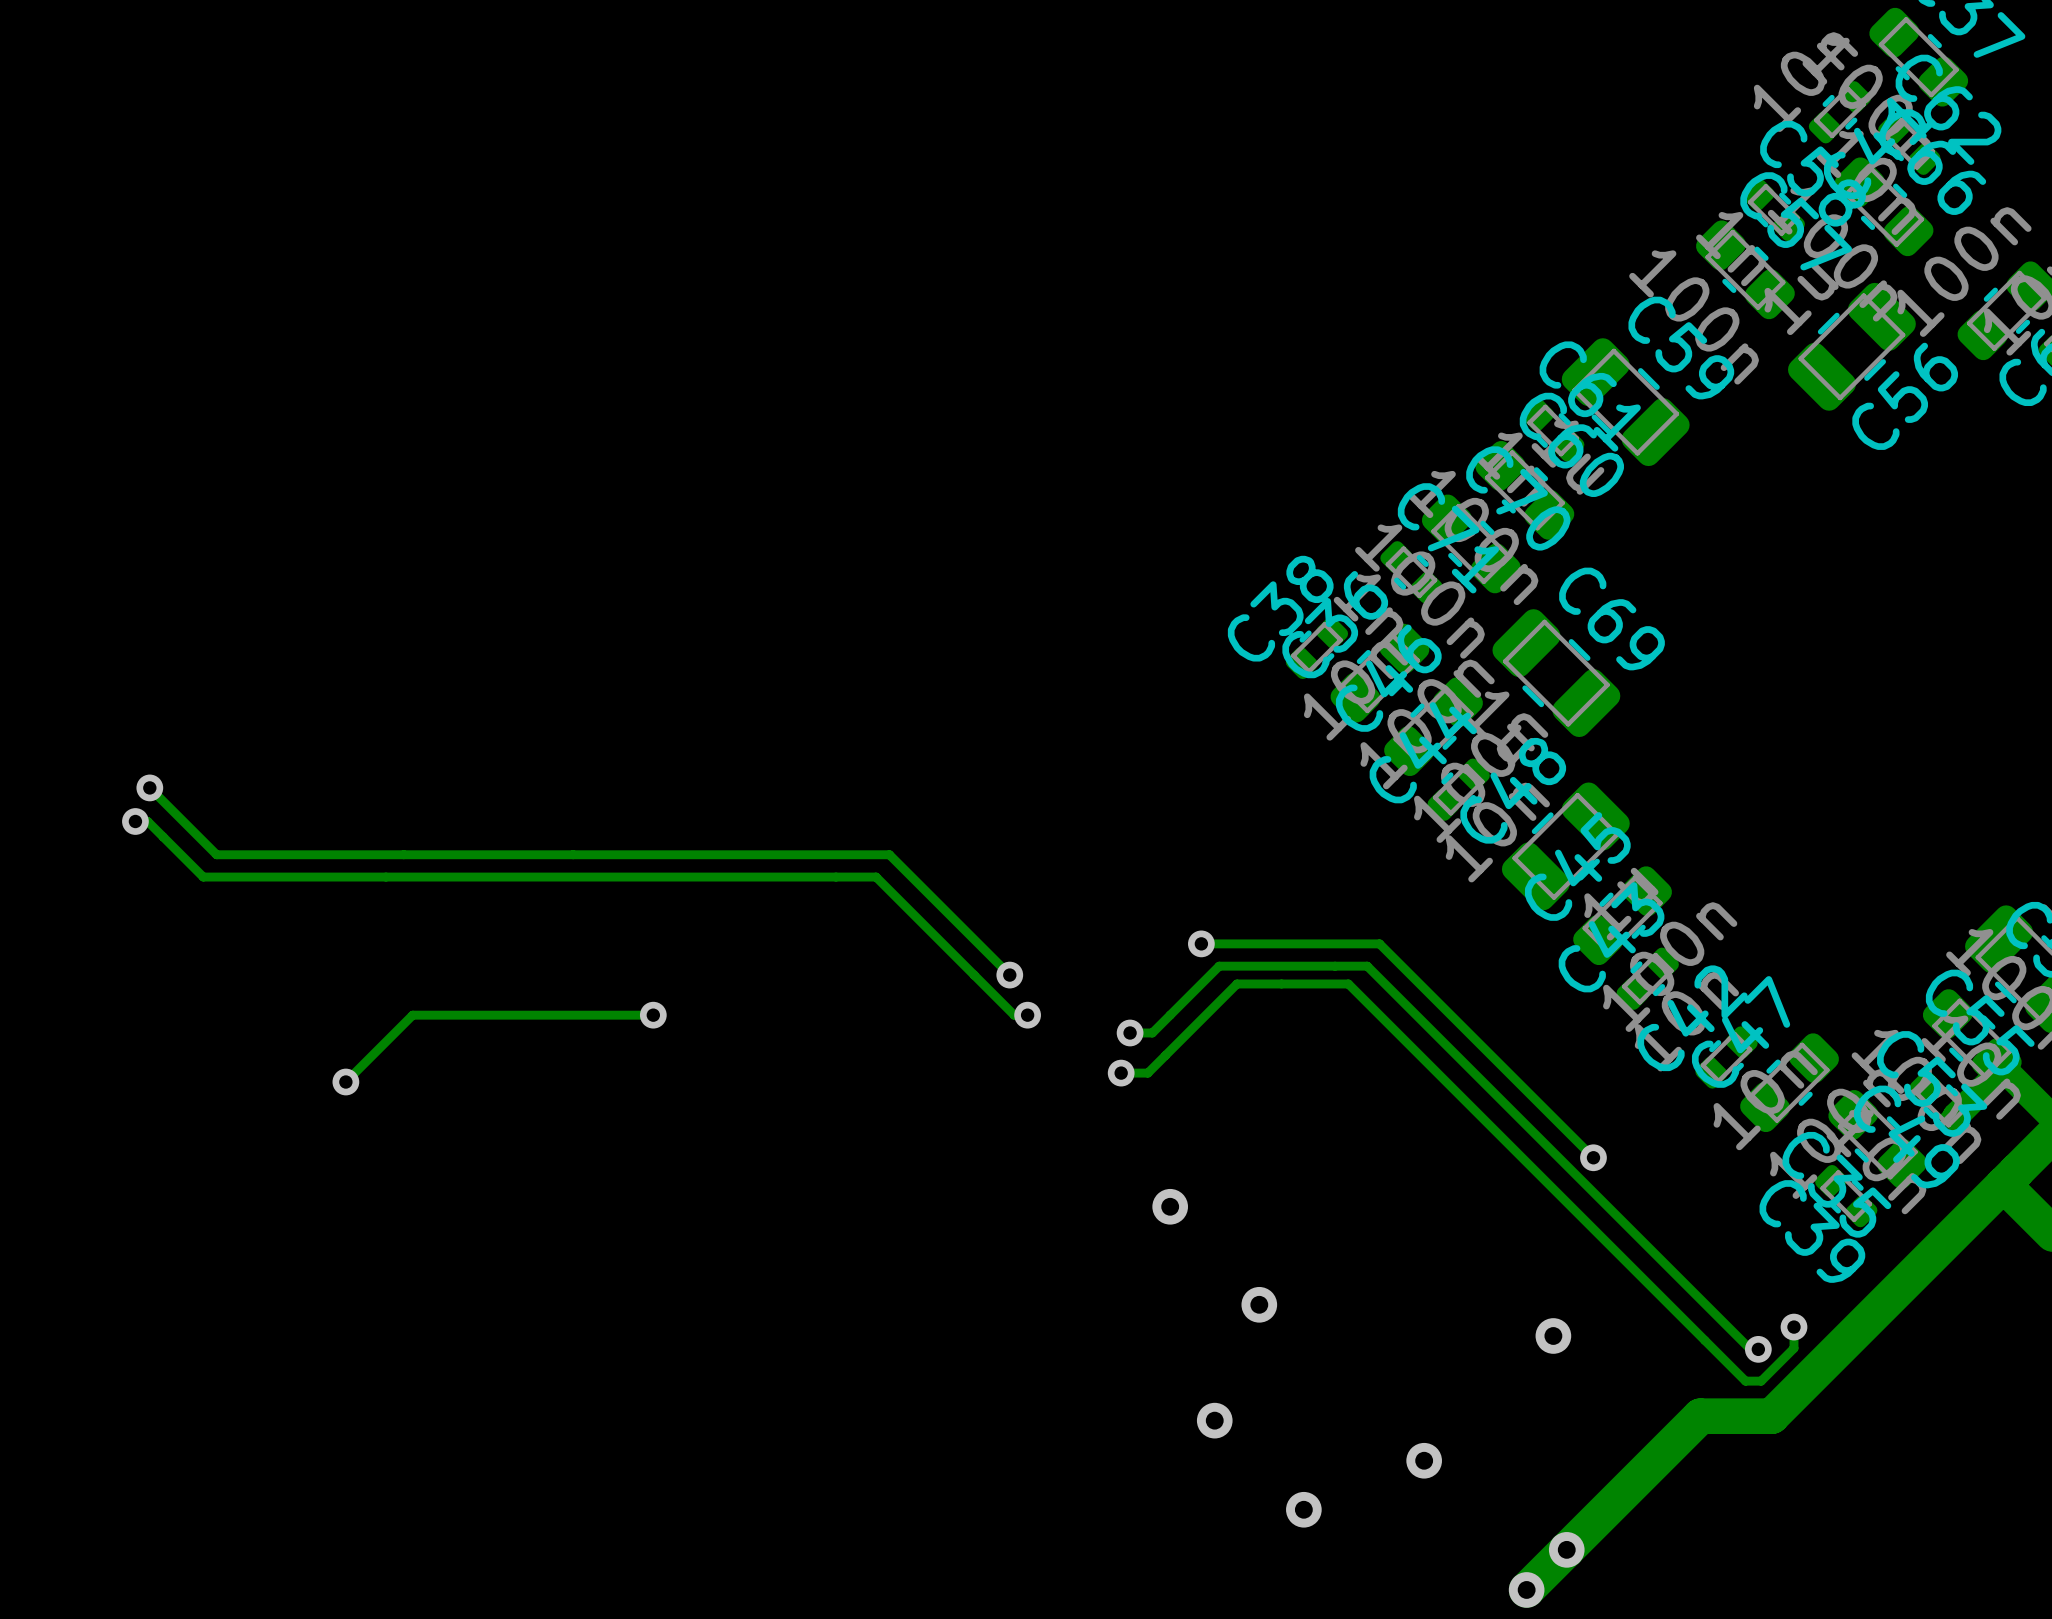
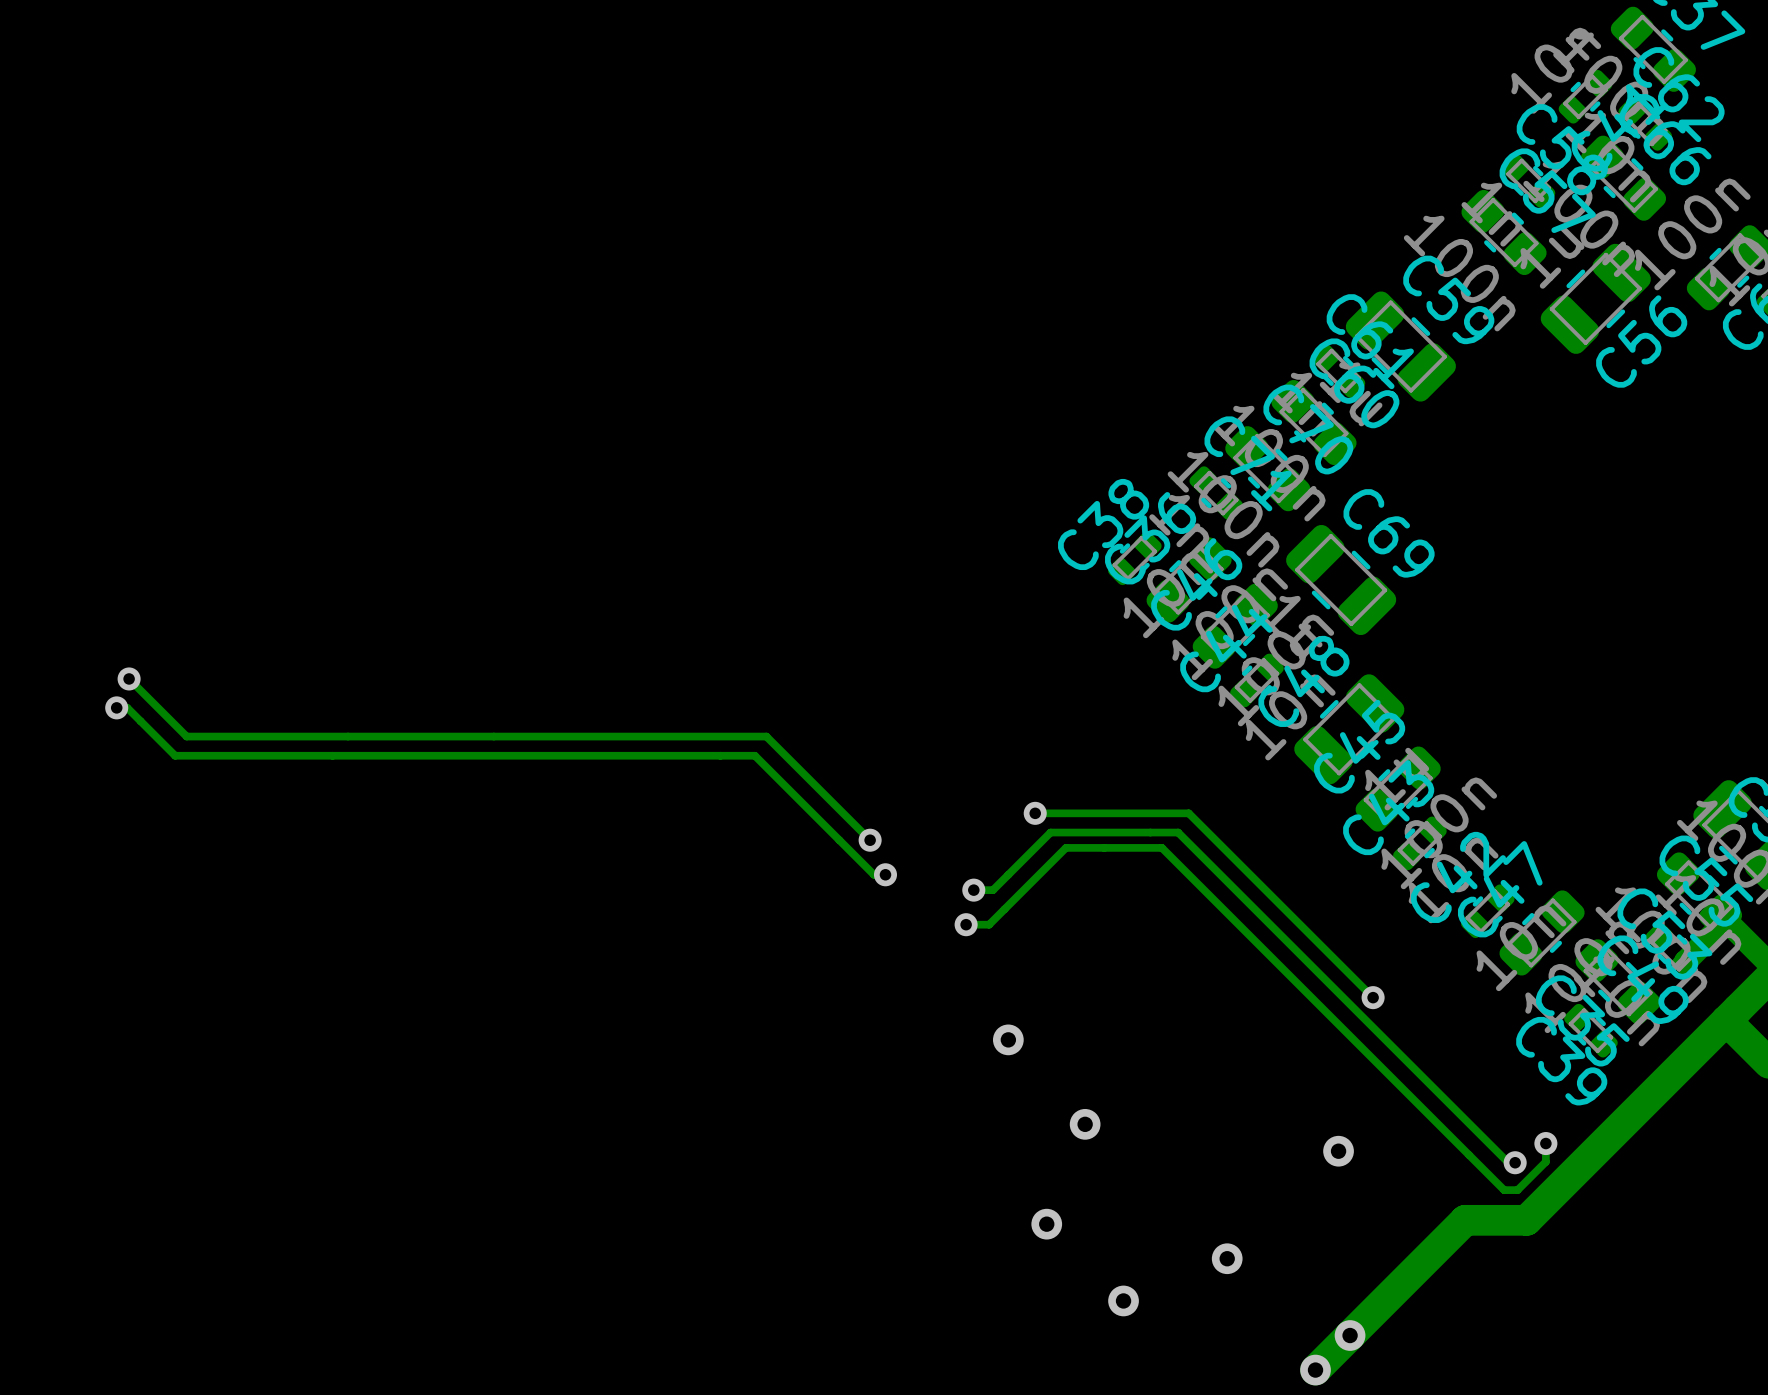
track: (653, 1015) (412, 1015) (345, 1082) -> none
via: (653, 1015) -> none
via: (345, 1082) -> none

